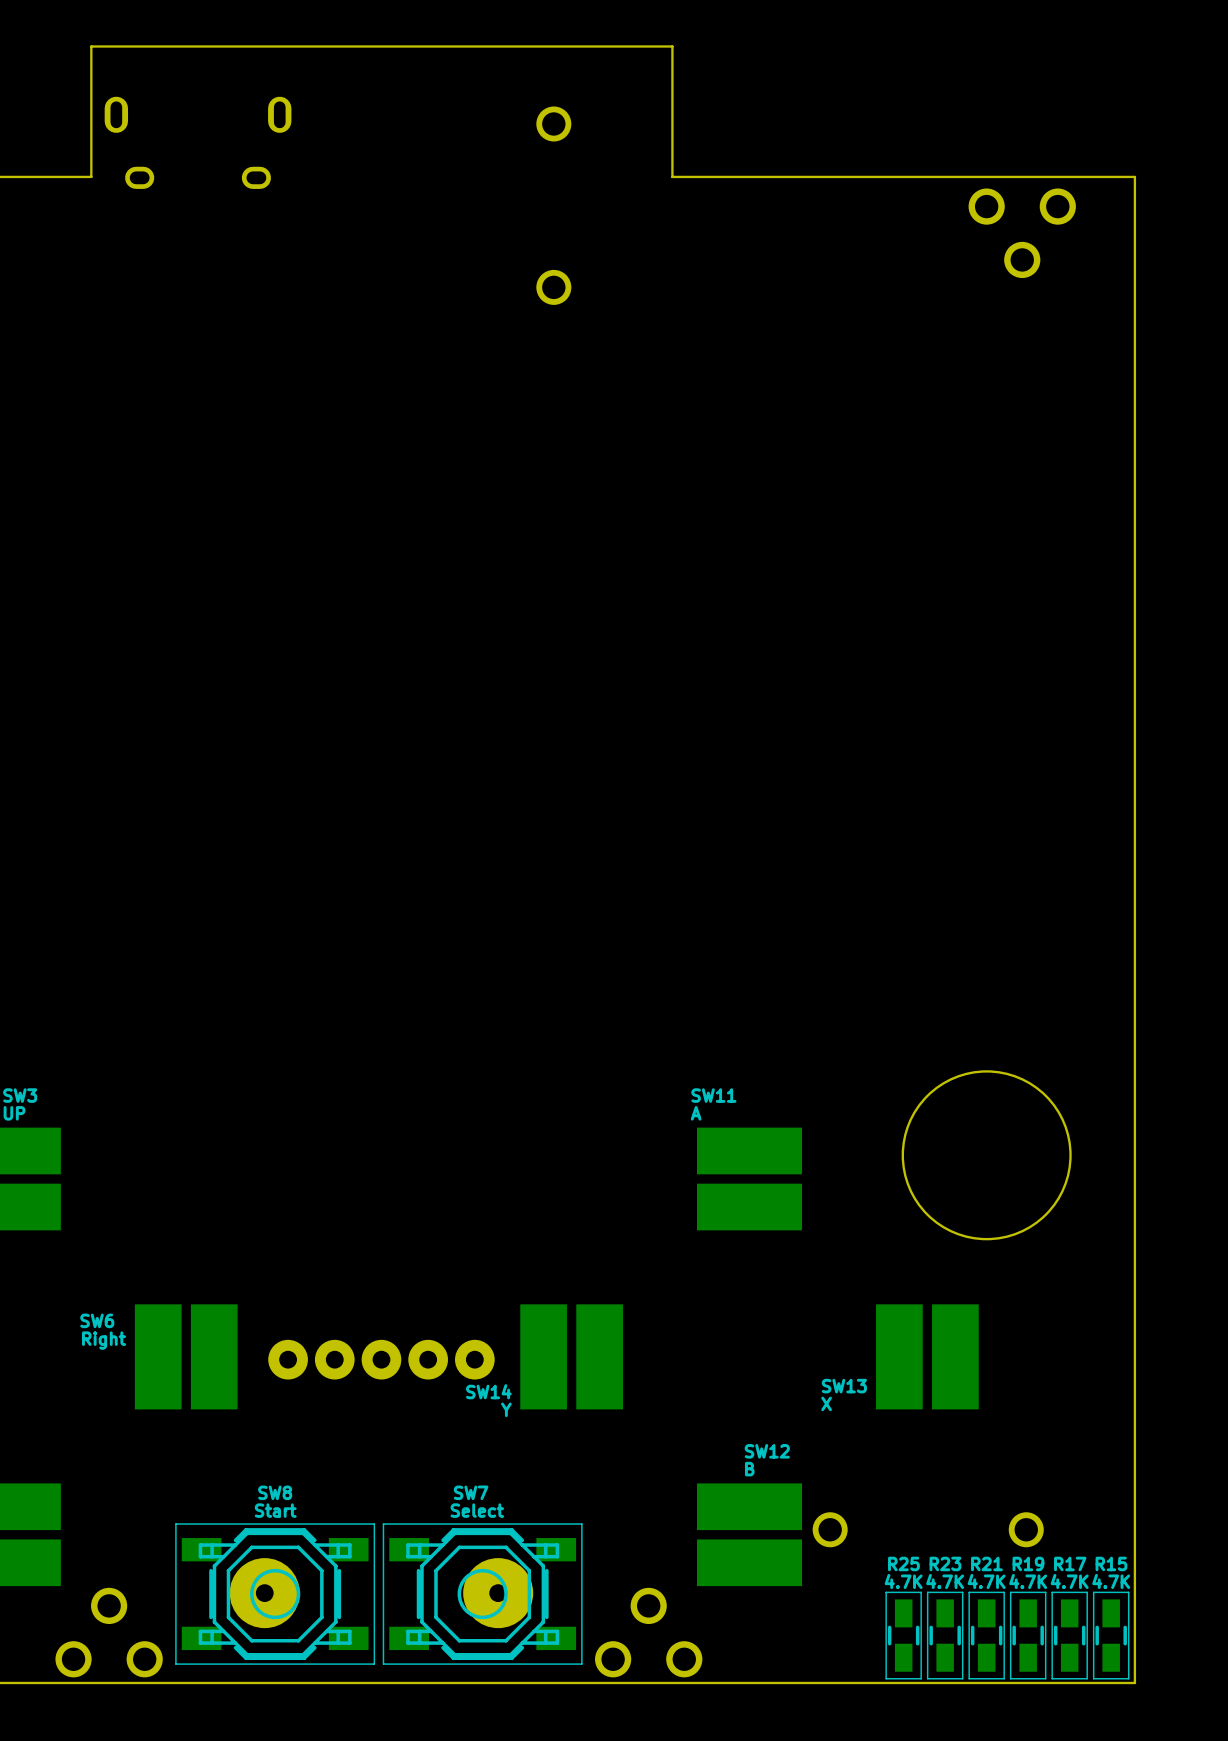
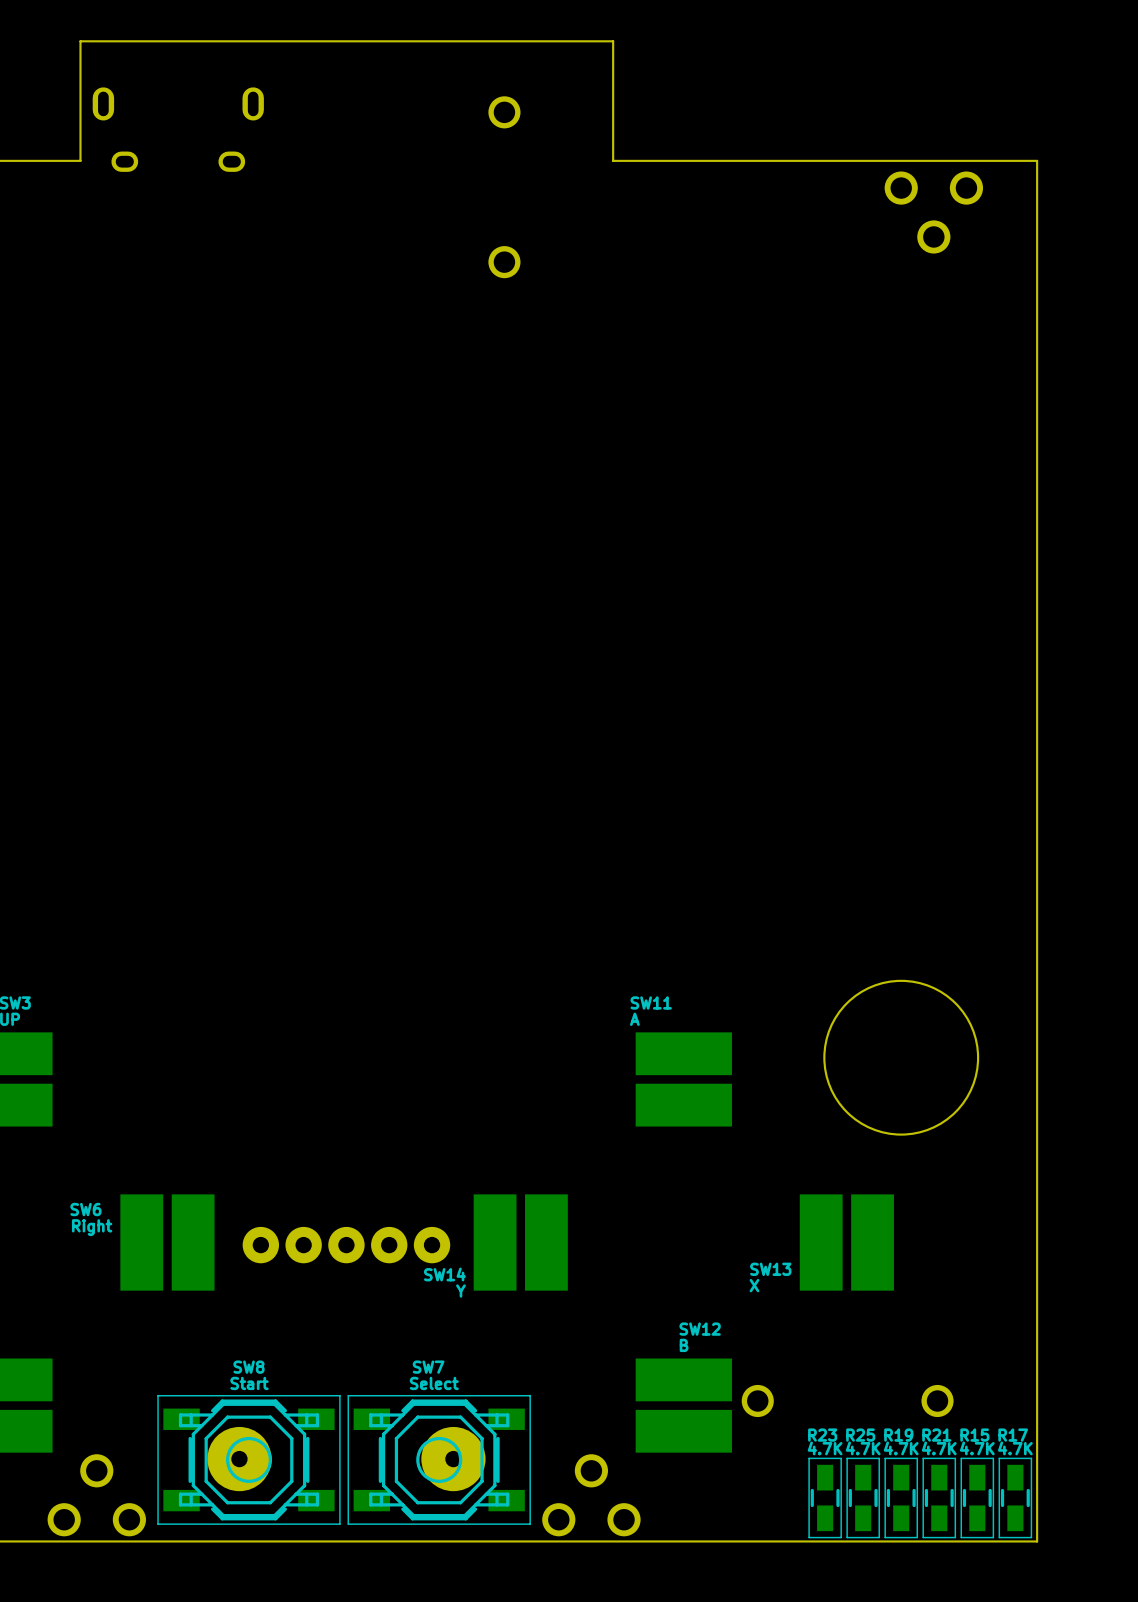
R25 name: R25 (903, 1563) -> R23 (822, 1435)
R23 name: R23 (945, 1563) -> R25 (860, 1435)
R21 name: R21 (986, 1563) -> R19 (898, 1435)
R19 name: R19 (1028, 1563) -> R21 (936, 1435)
R17 name: R17 (1070, 1563) -> R15 (974, 1435)
R15 name: R15 (1111, 1563) -> R17 (1013, 1435)

